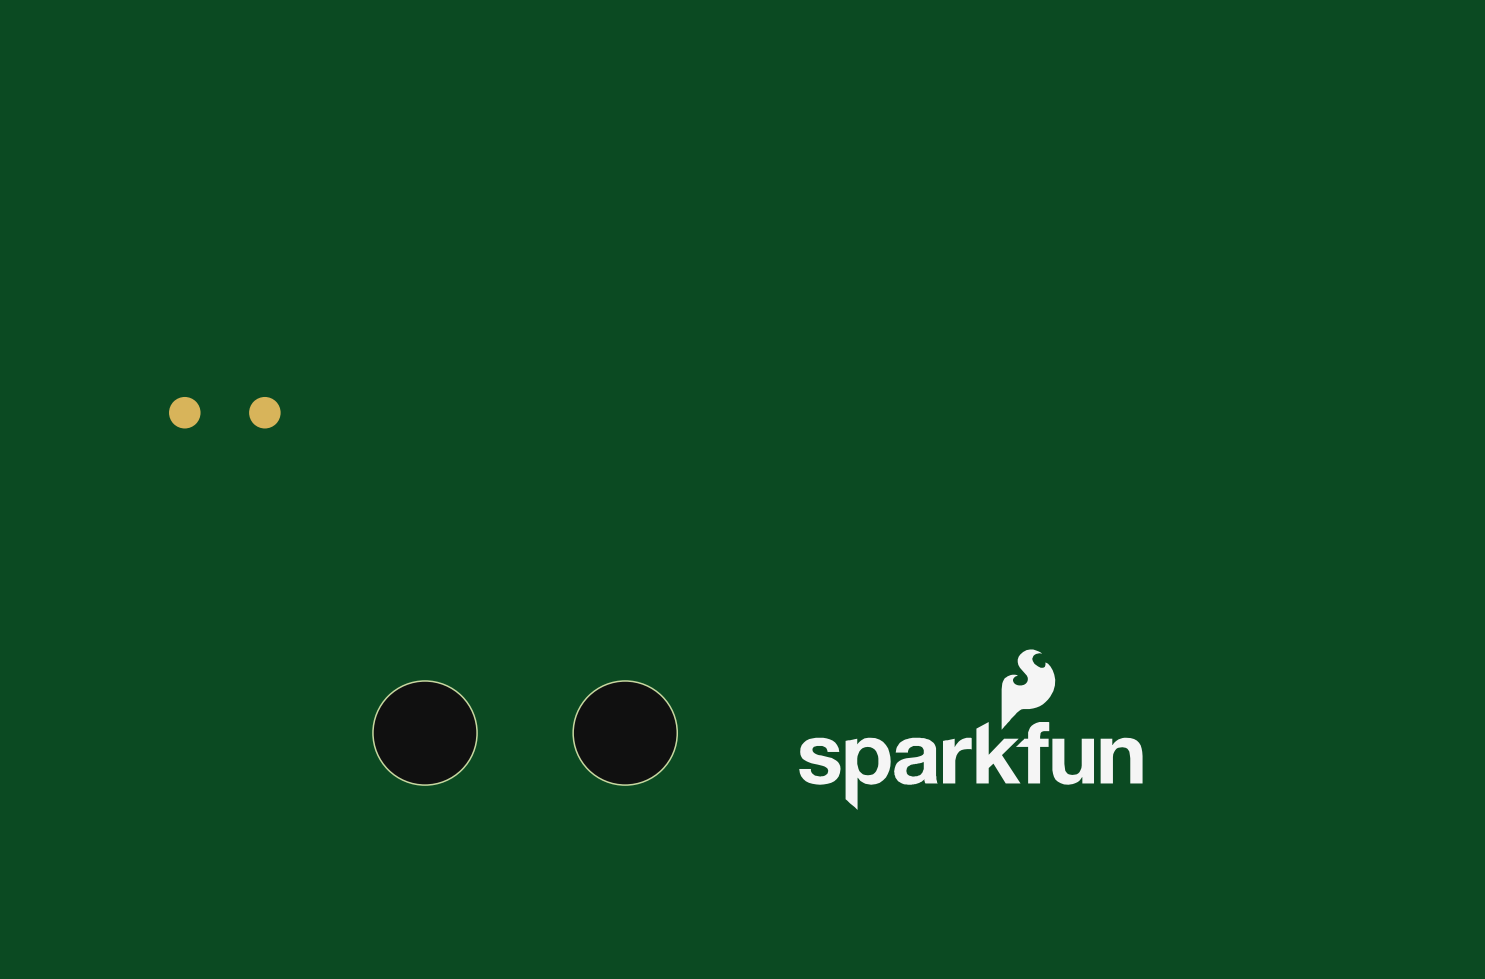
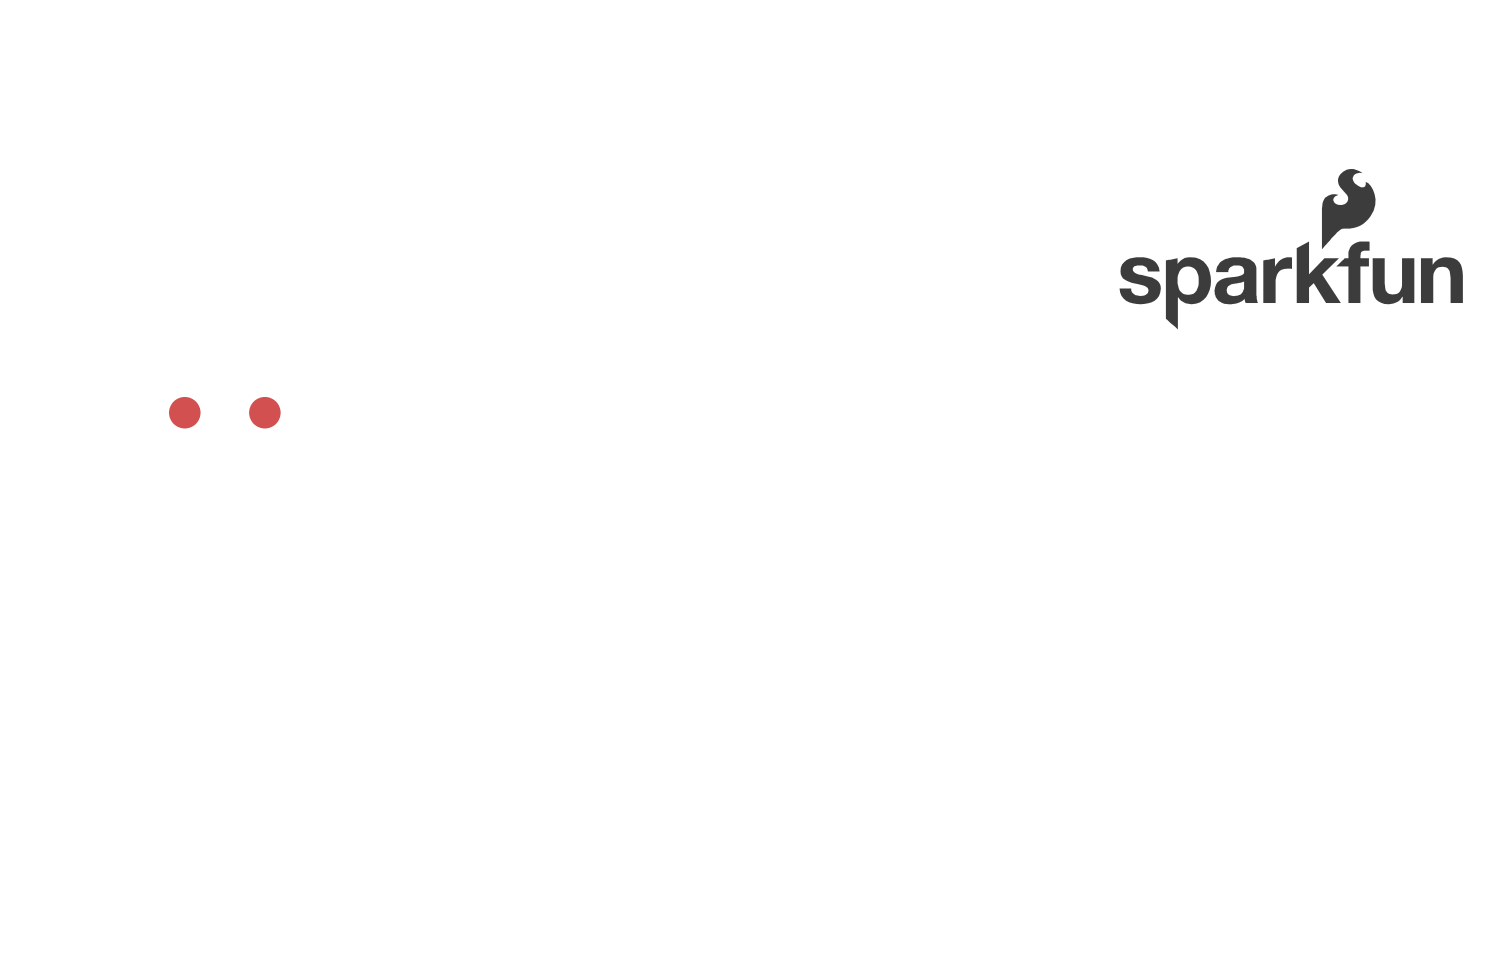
drawing position: (970, 729) -> (1291, 249)
part: (425, 733) -> none
part: (625, 733) -> none

